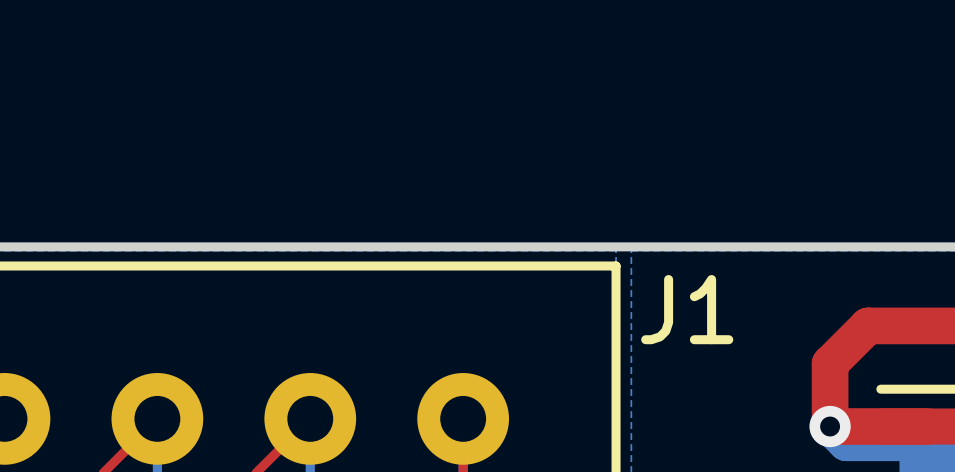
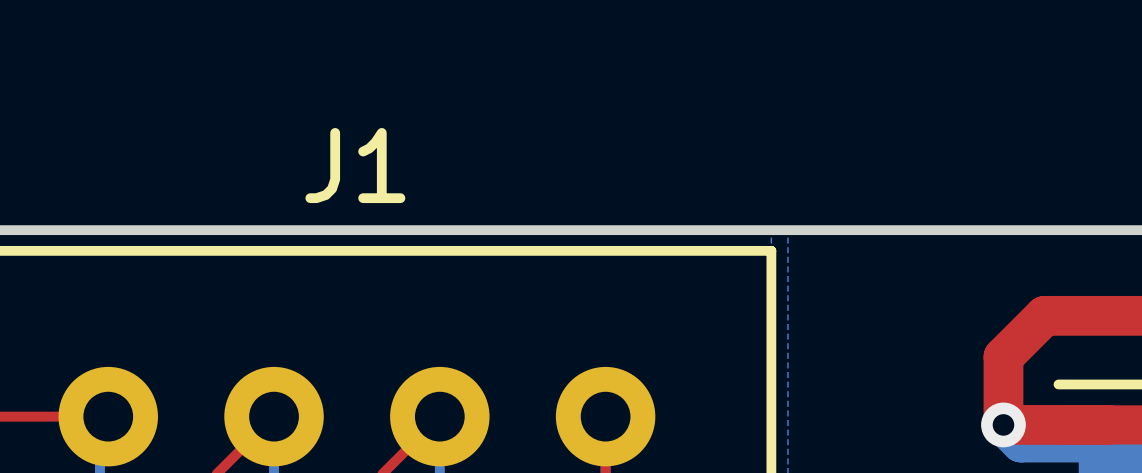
J1 name position: J1 (687, 309) -> J1 (355, 165)

